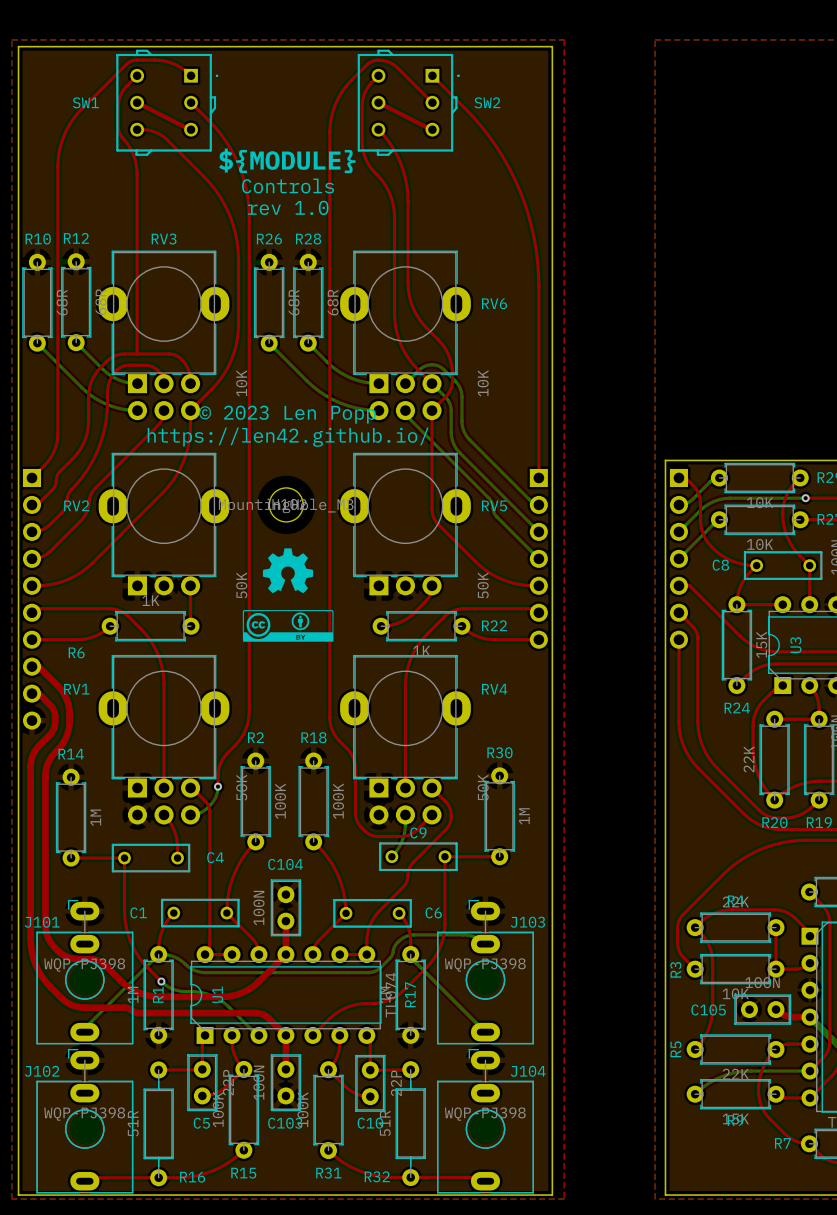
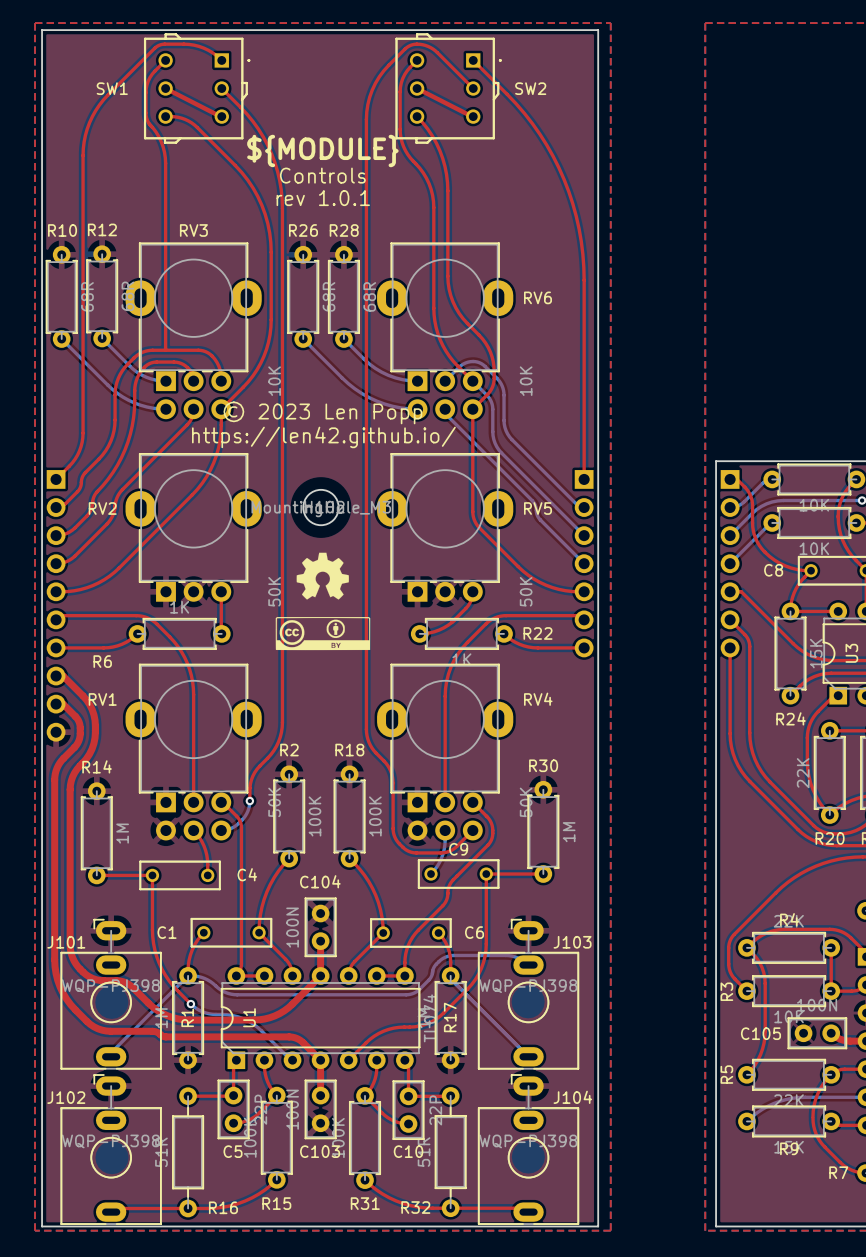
text: rev 1.0 (288, 207) -> rev 1.0.1 (323, 198)

